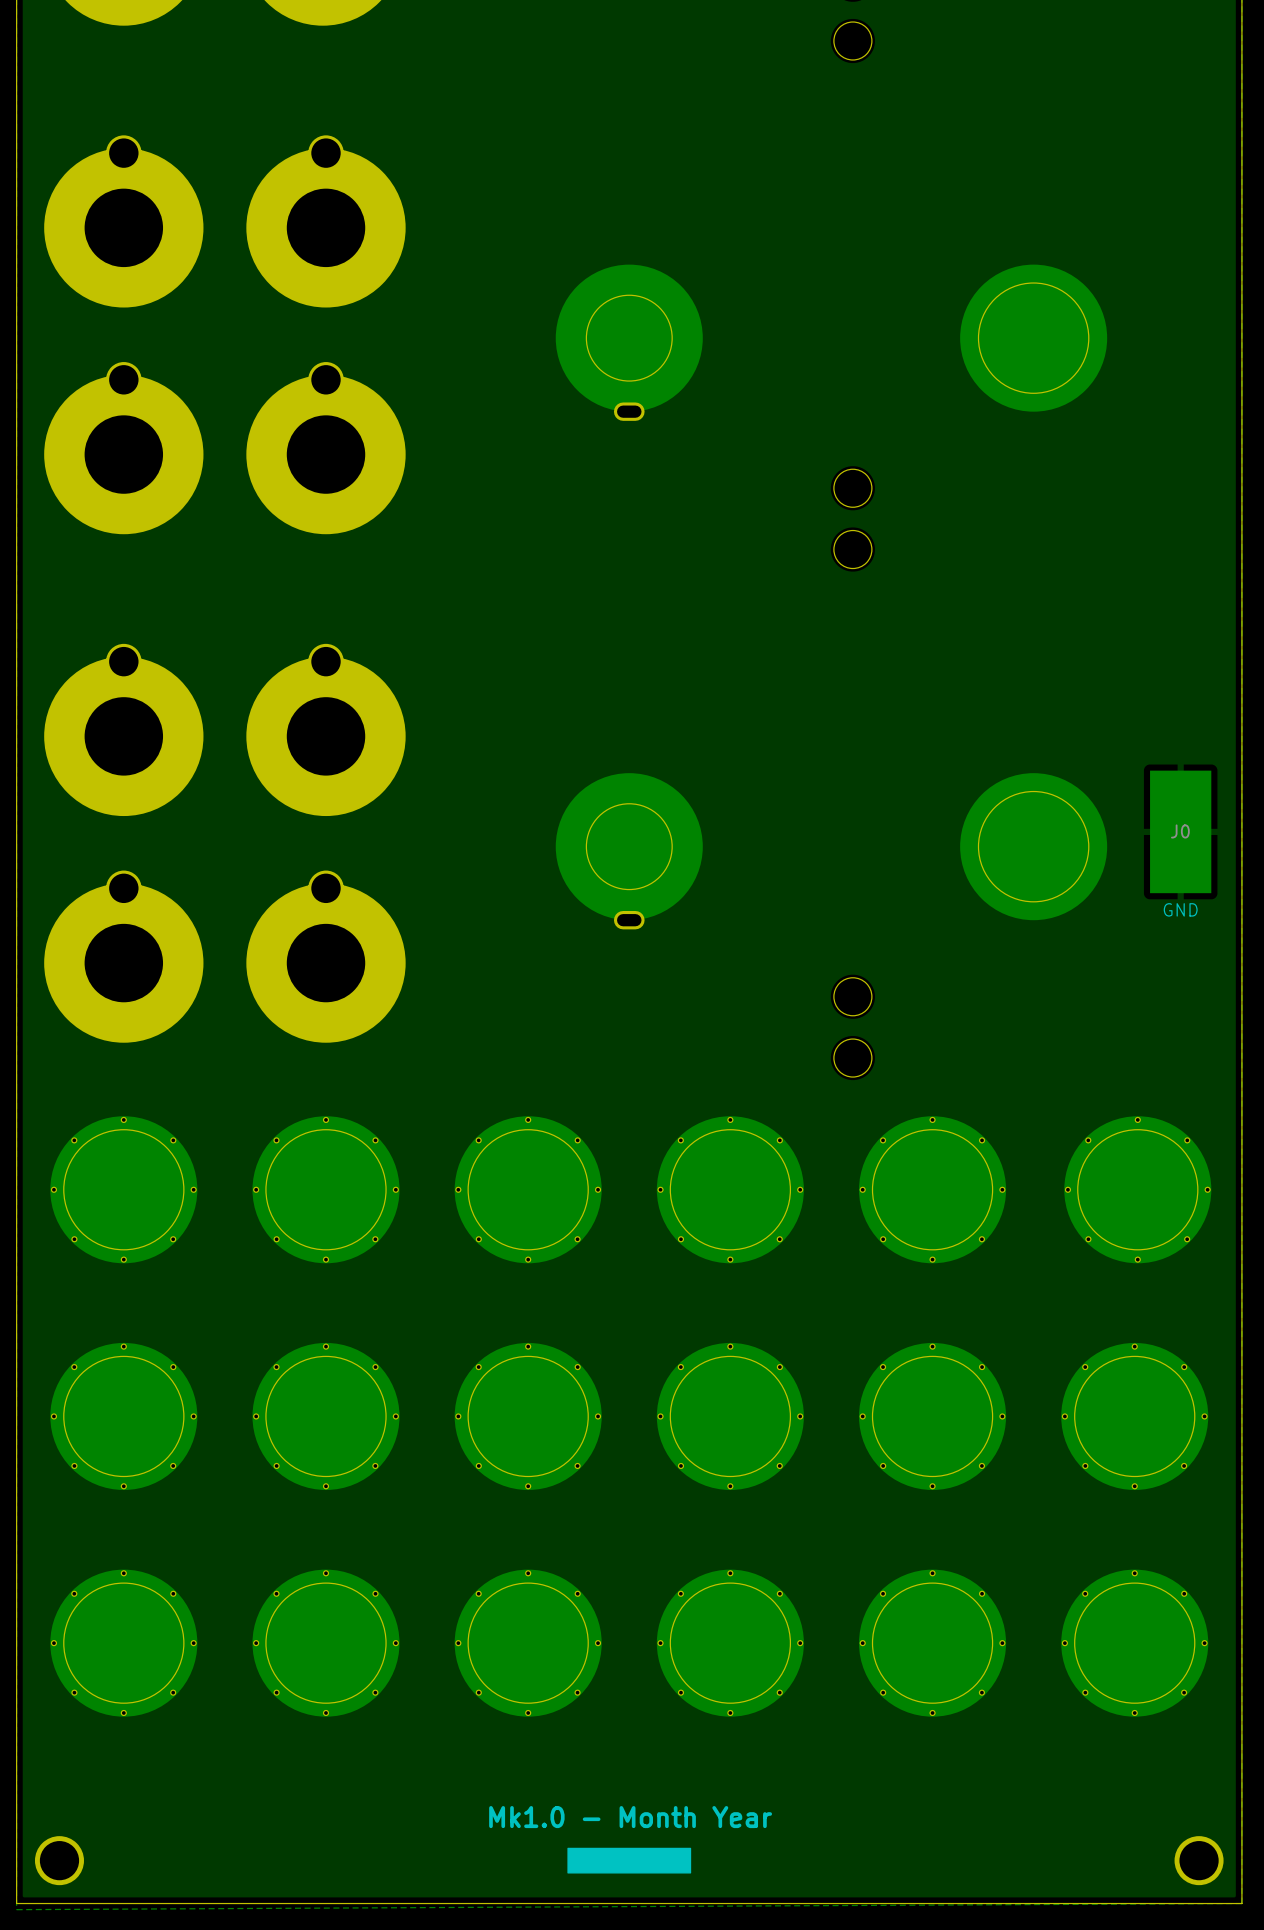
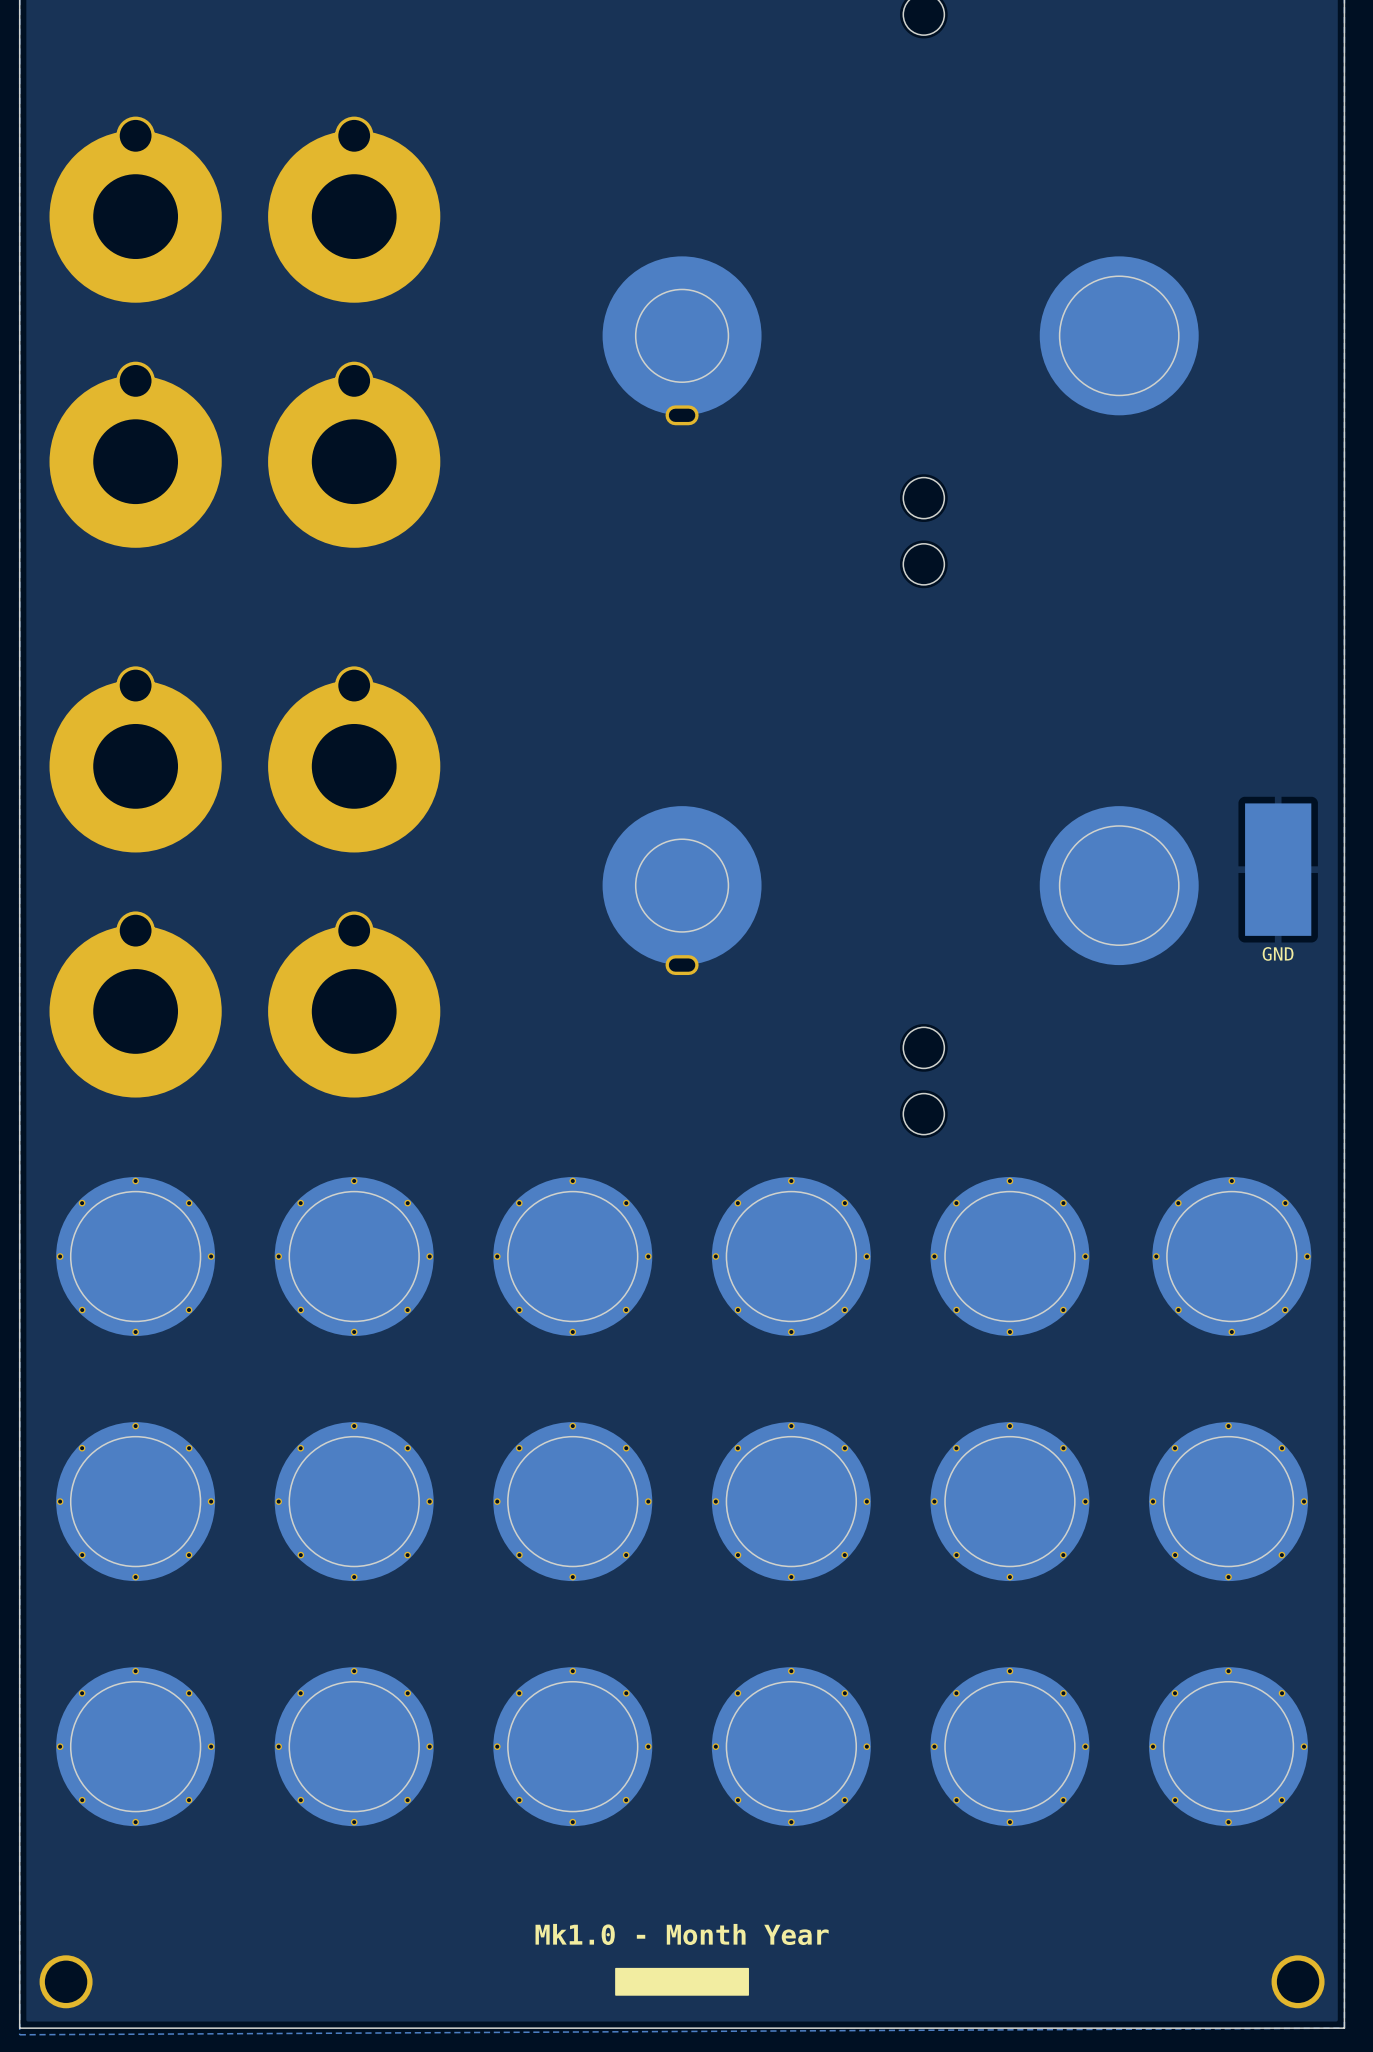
J0 name: J0 (1180, 831) -> none

